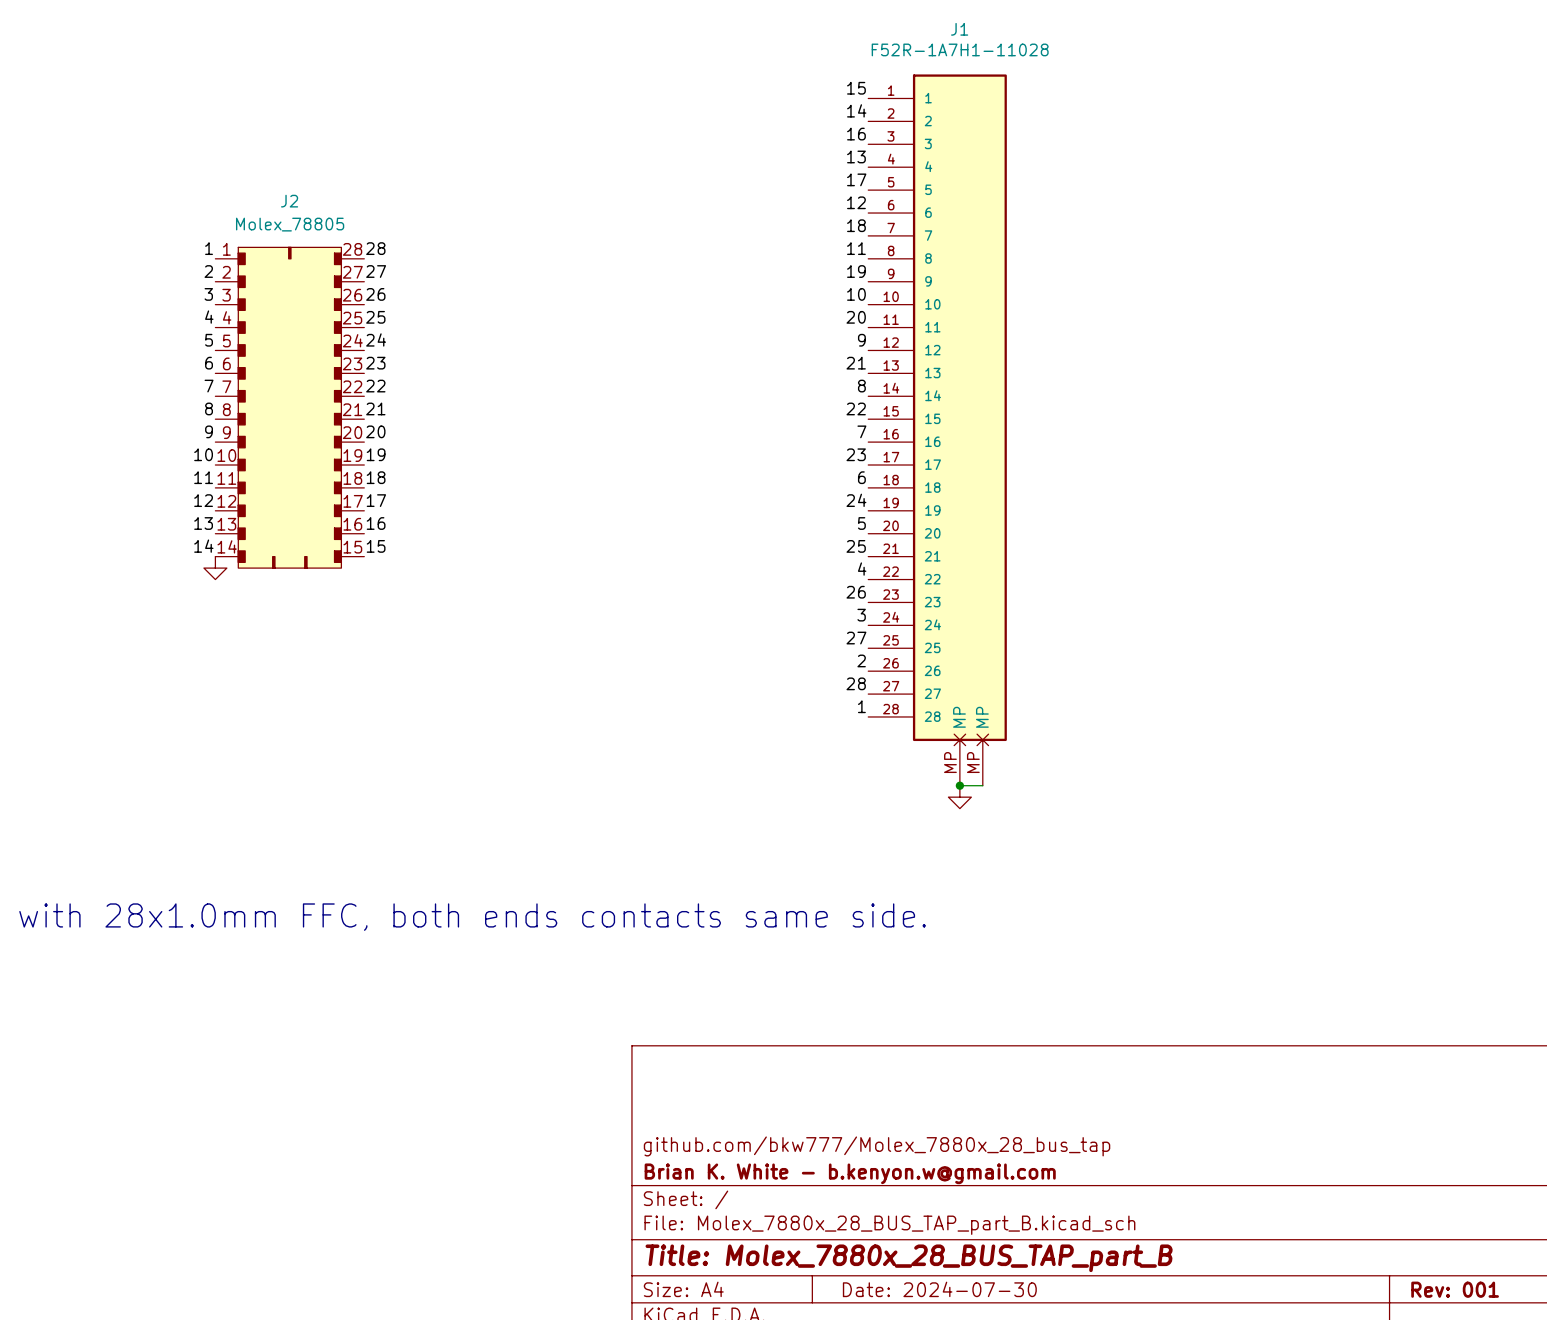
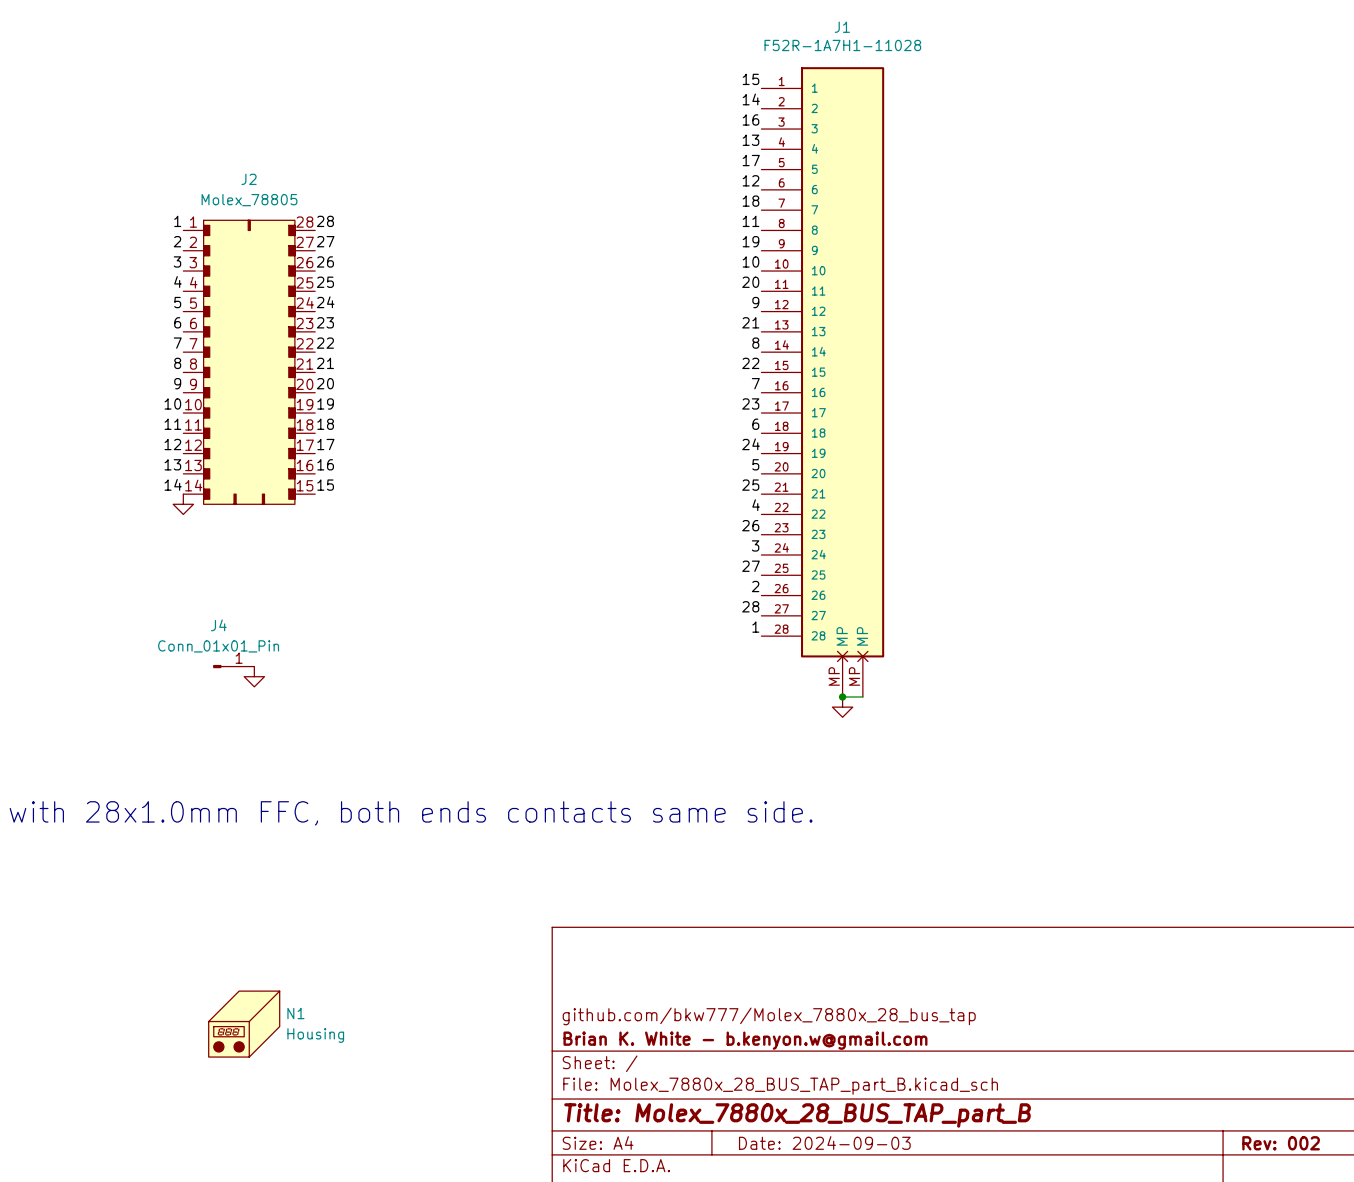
J4: none -> Conn_01x01_Pin (233, 666)
power symbol: none -> (254, 676)
N1: none -> Housing (244, 1024)
title block: Date: 2024-07-30 (939, 1289) -> Date: 2024-09-03 (824, 1143)
title block: Rev: 001 (1455, 1289) -> Rev: 002 (1281, 1143)

